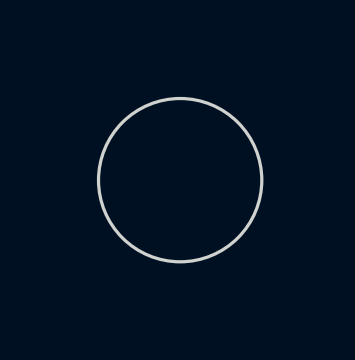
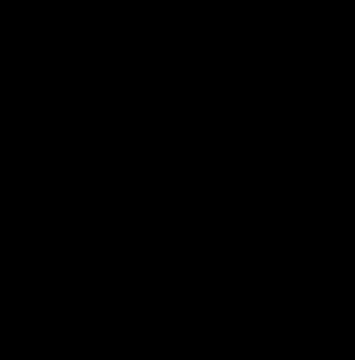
round board edge: [96, 96, 264, 264] -> none

